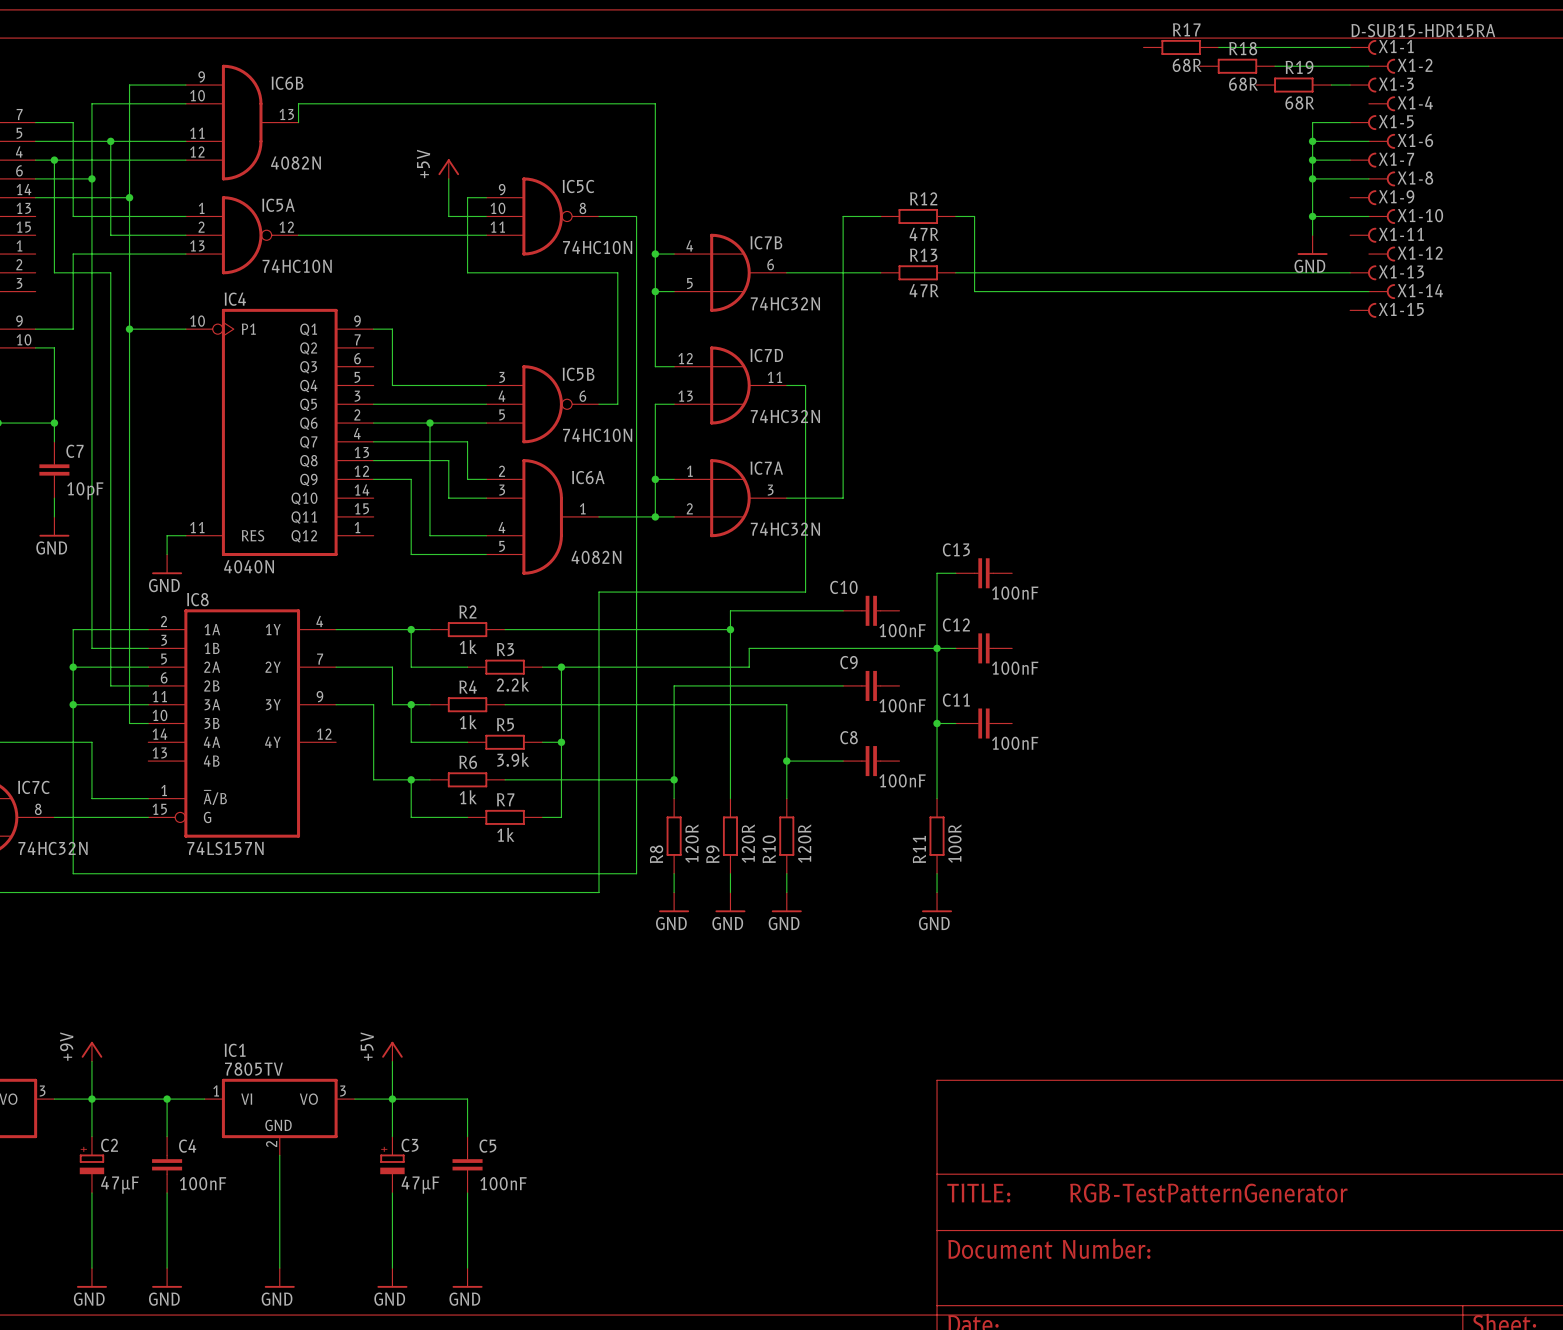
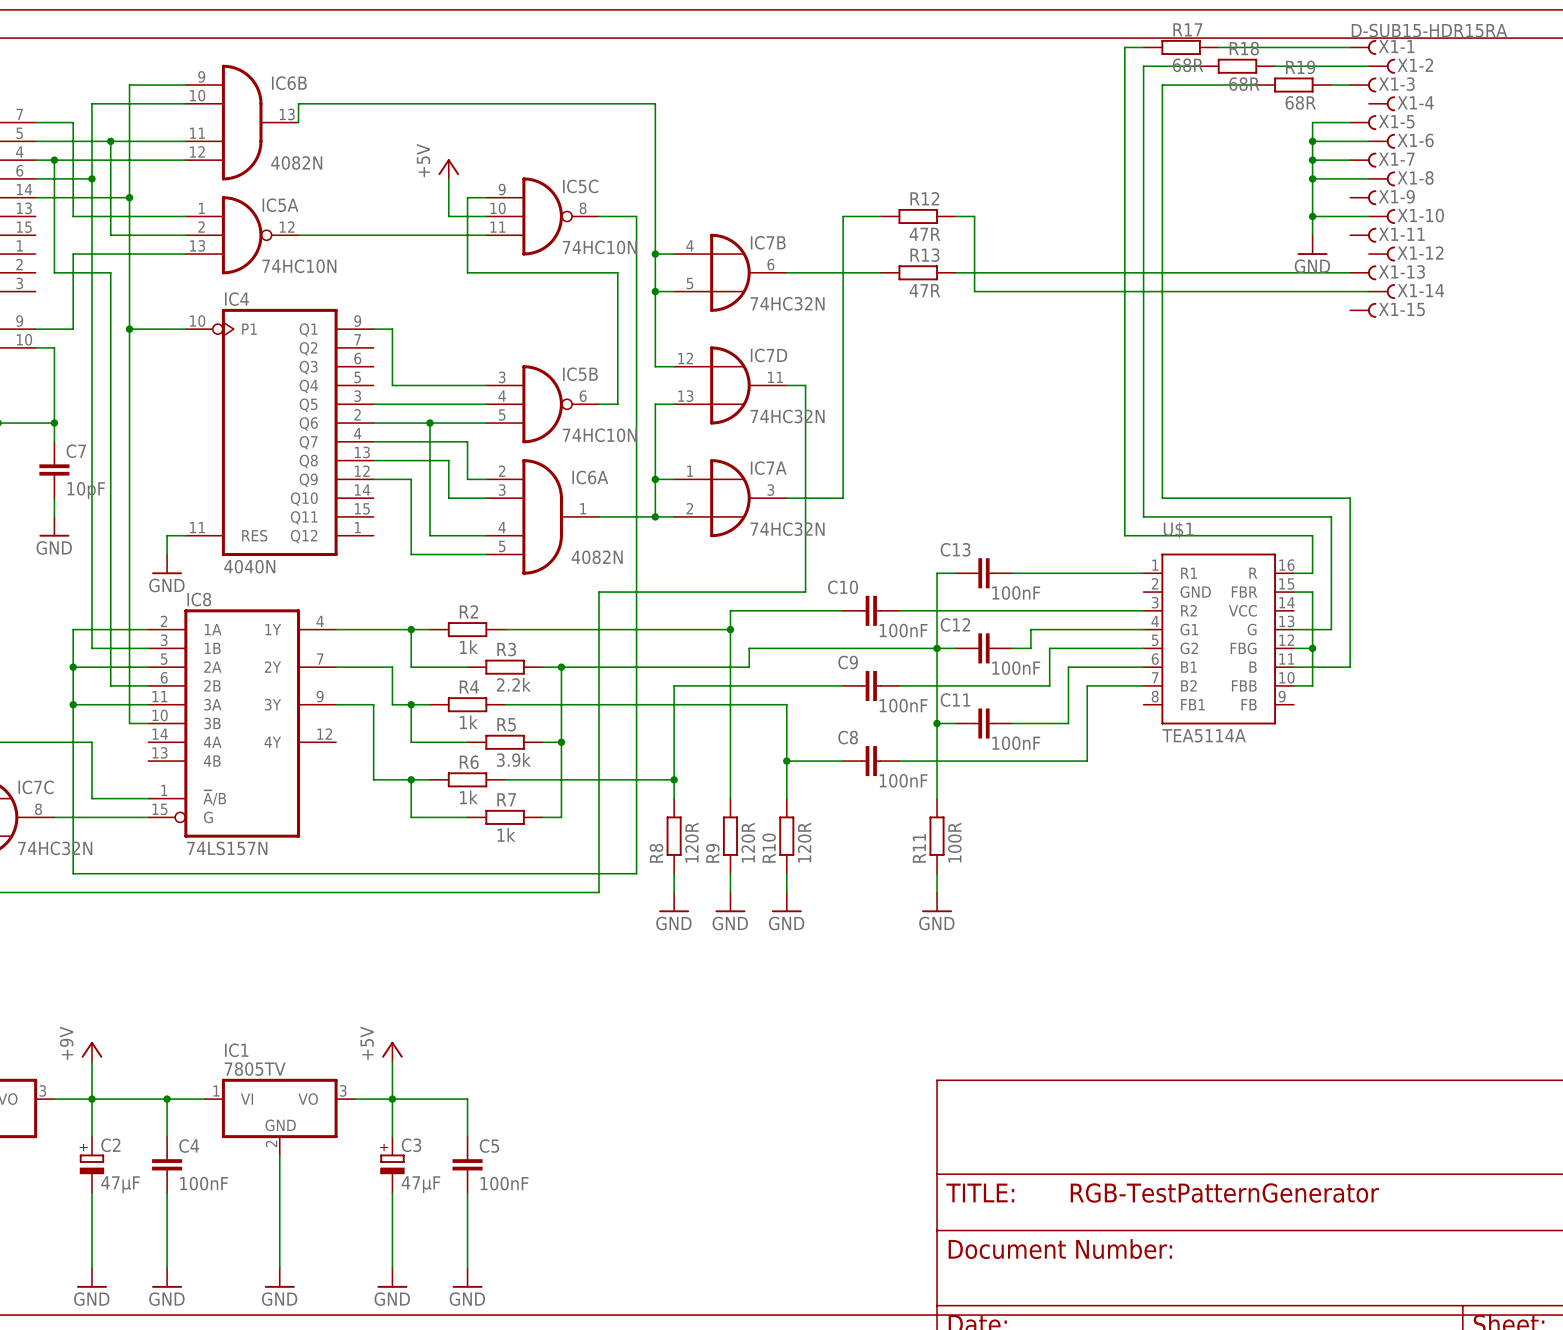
wire: none -> (1143, 47) (1124, 47) (1124, 535) (1312, 535) (1312, 573) (1293, 573)
wire: none -> (1199, 66) (1143, 66) (1143, 516) (1331, 516) (1331, 629) (1293, 629)
wire: none -> (1256, 85) (1162, 85) (1162, 498) (1350, 498) (1350, 667) (1293, 667)
wire: none -> (1012, 573) (1143, 573)
wire: none -> (1293, 592) (1312, 592) (1312, 685) (1293, 685)
wire: none -> (899, 610) (1143, 610)
wire: none -> (1143, 629) (1030, 629) (1030, 648) (1012, 648)
U$1: none -> TEA5114A (1218, 639)
wire: none -> (1143, 648) (1049, 648) (1049, 685) (899, 685)
wire: none -> (1293, 648) (1312, 648)
junction: none -> (1312, 648)
wire: none -> (1143, 667) (1068, 667) (1068, 723) (1012, 723)
wire: none -> (1143, 685) (1087, 685) (1087, 761) (899, 761)

